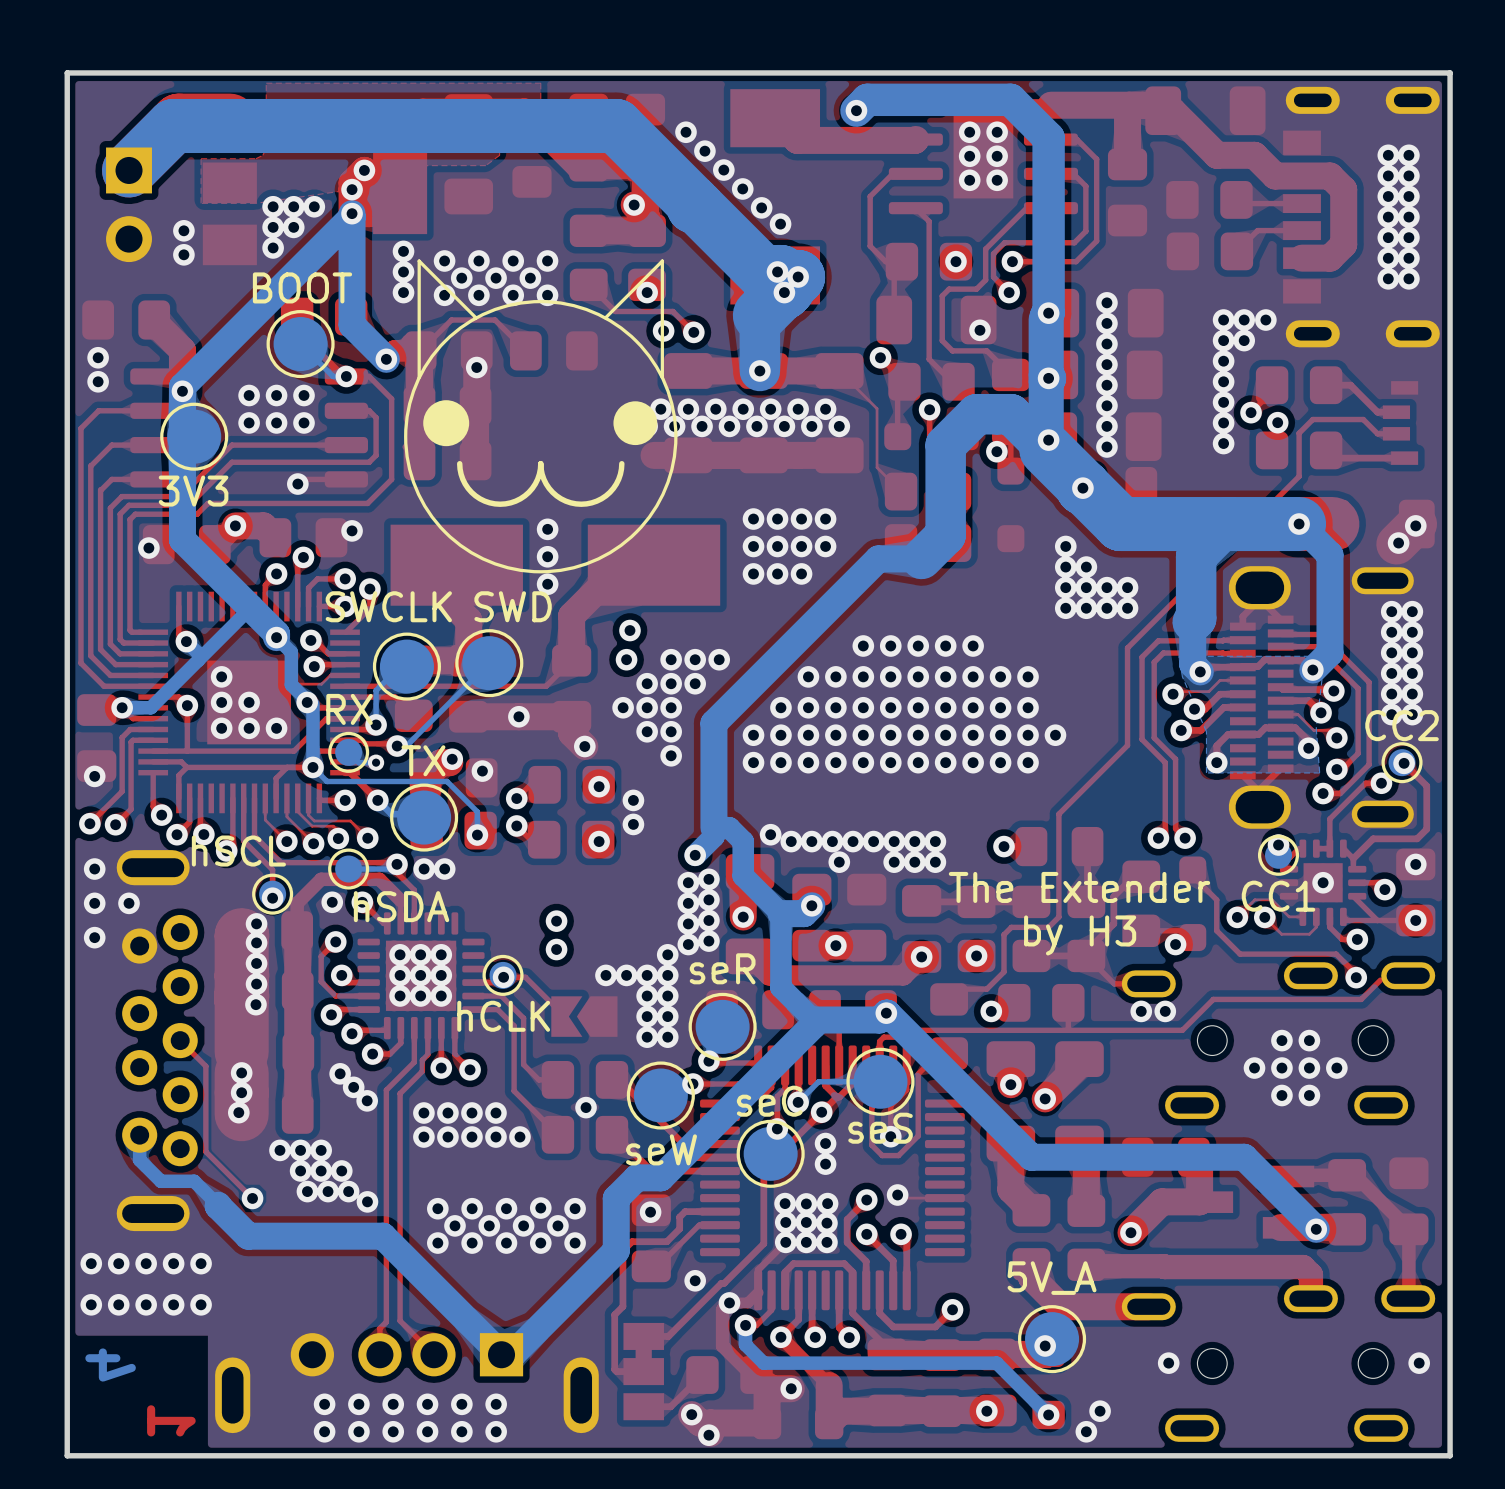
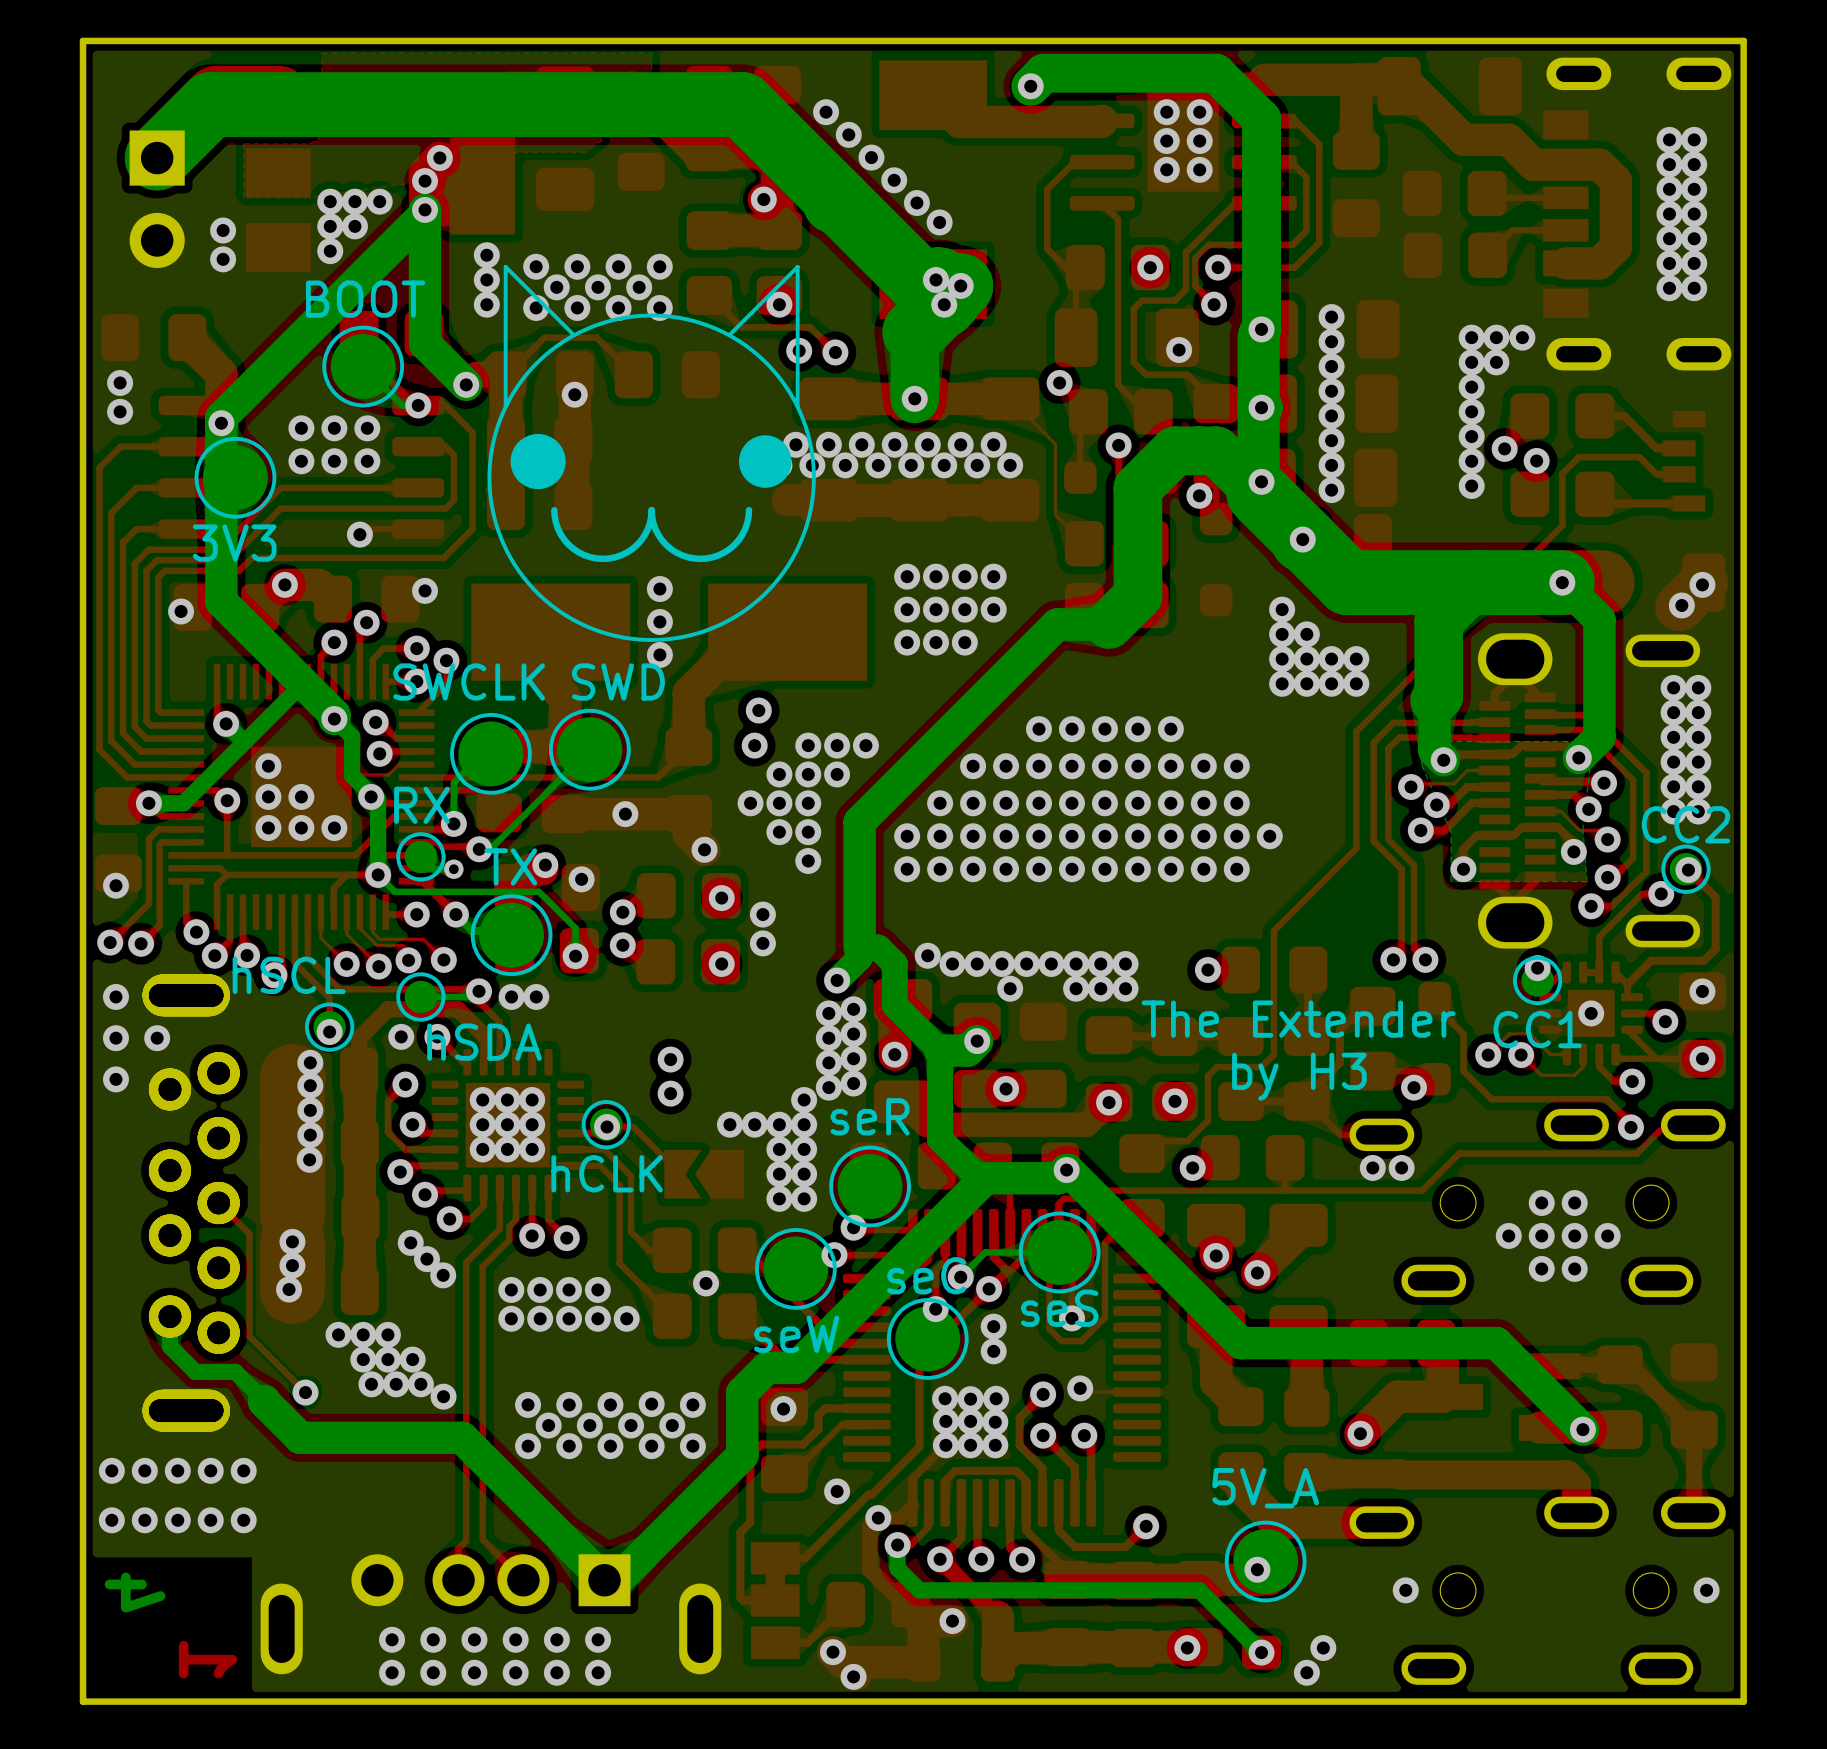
part: none -> (191, 1203)

